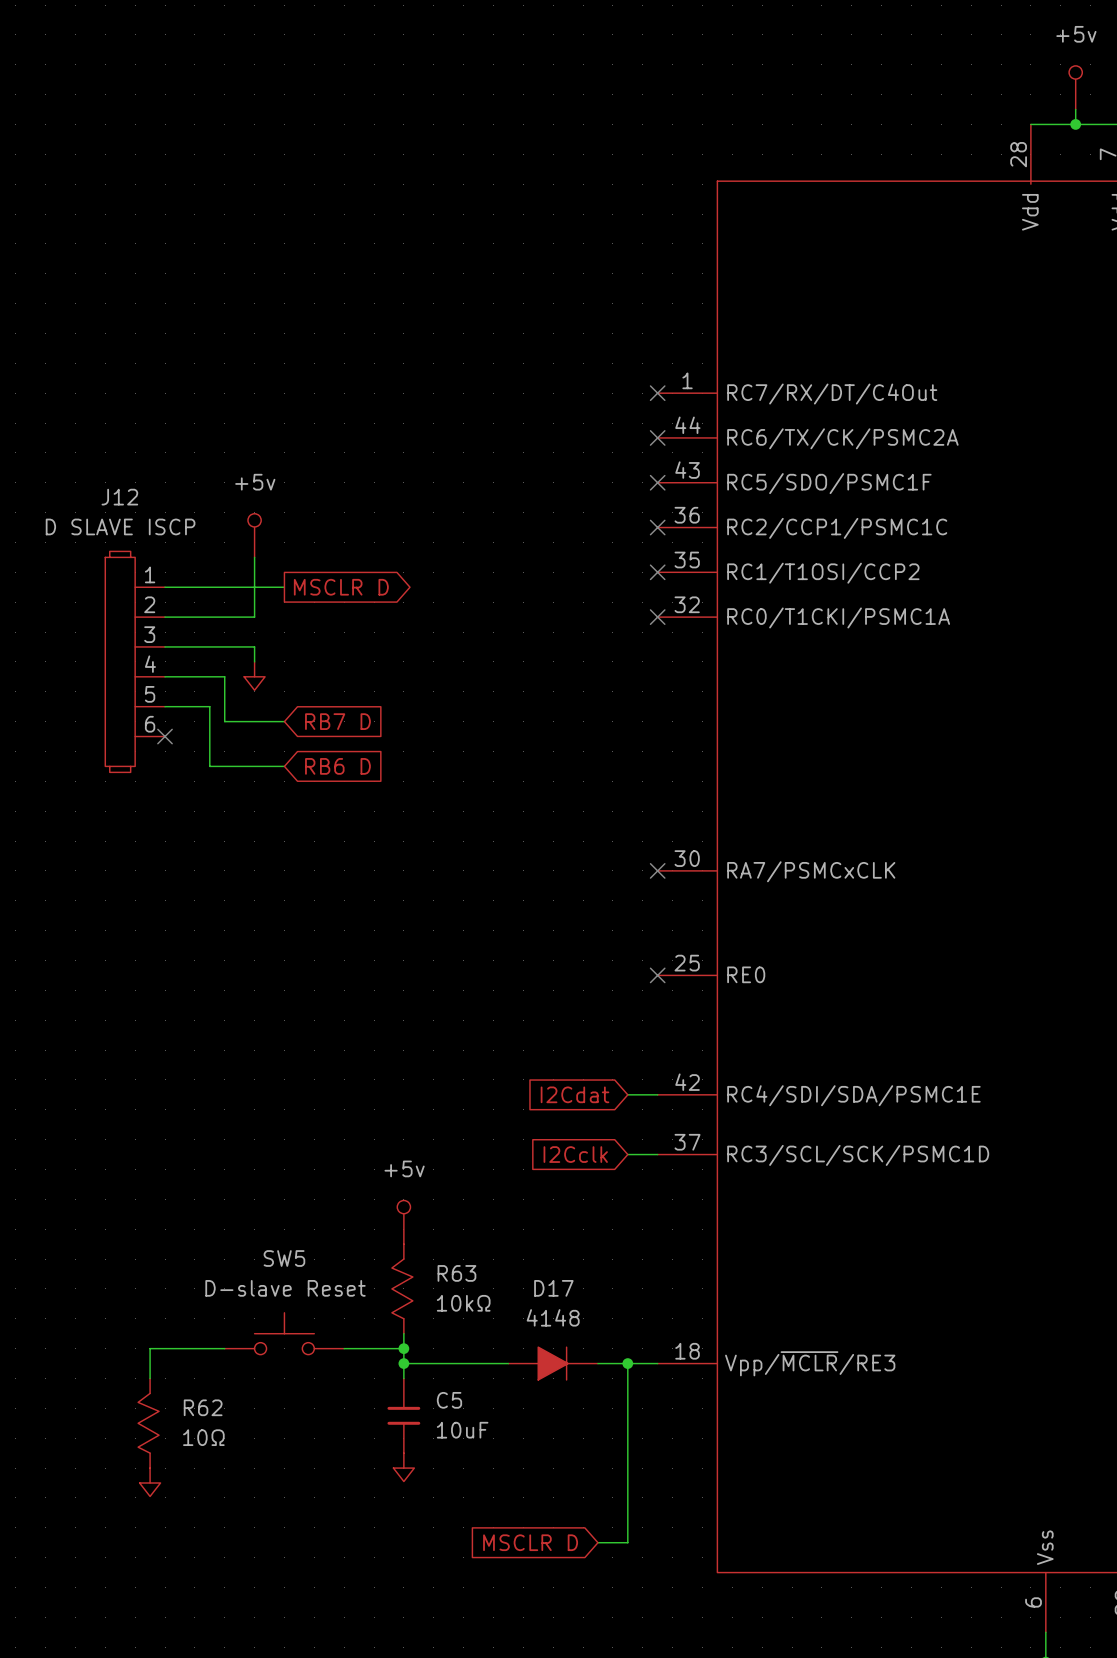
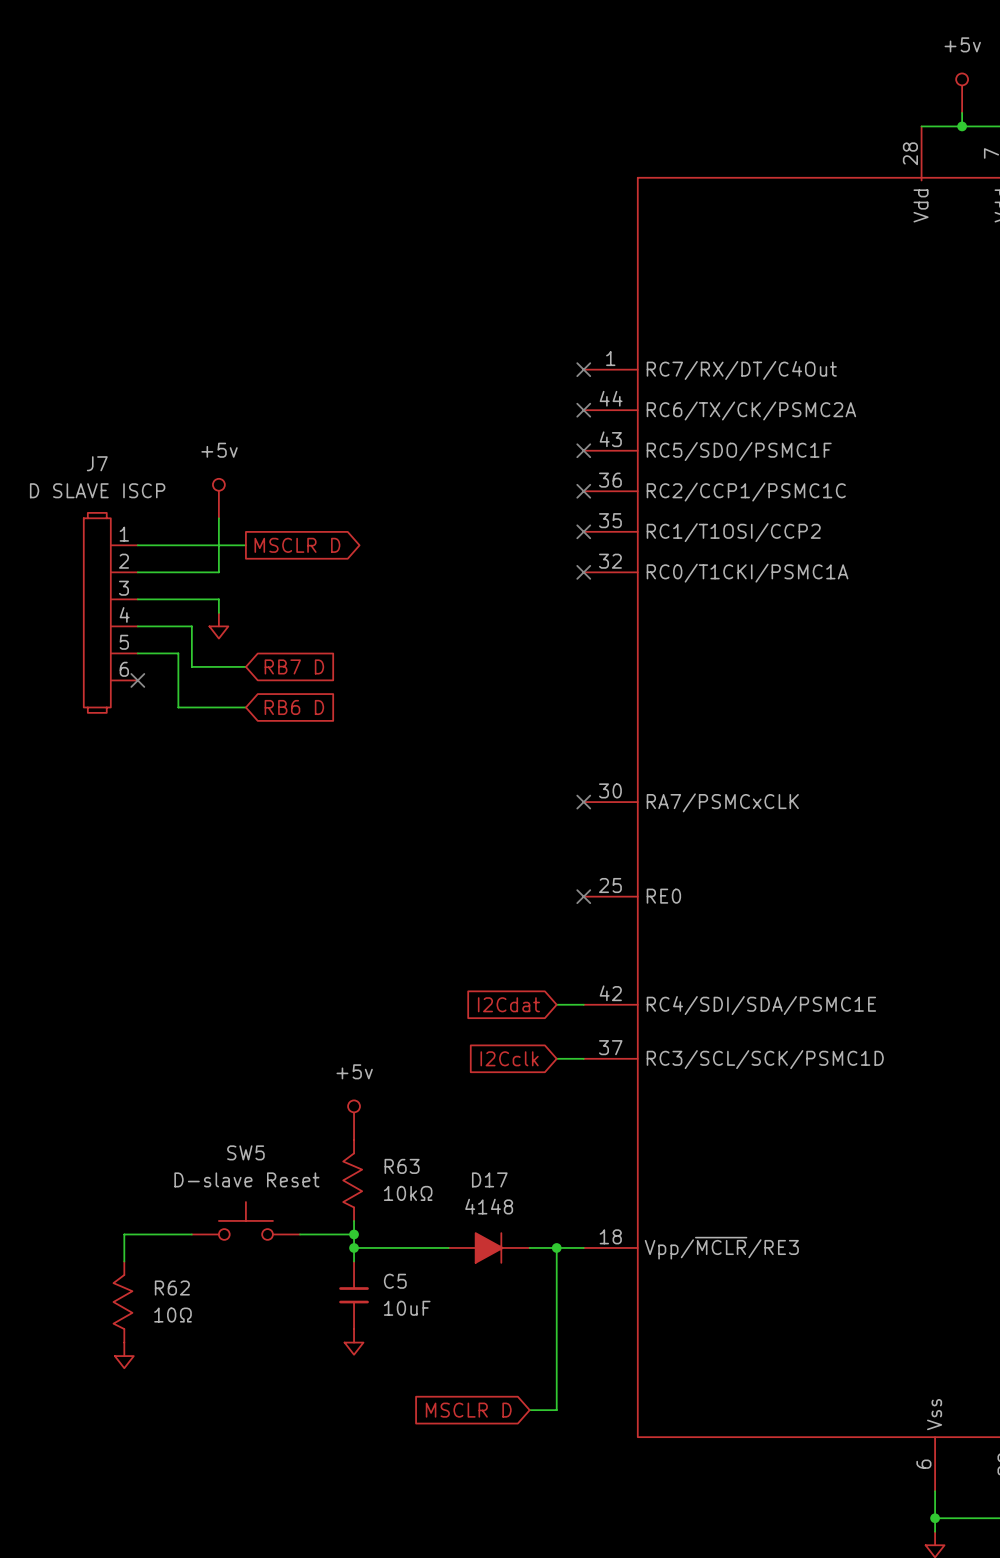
J12 name: J12 (119, 497) -> J7 (97, 463)

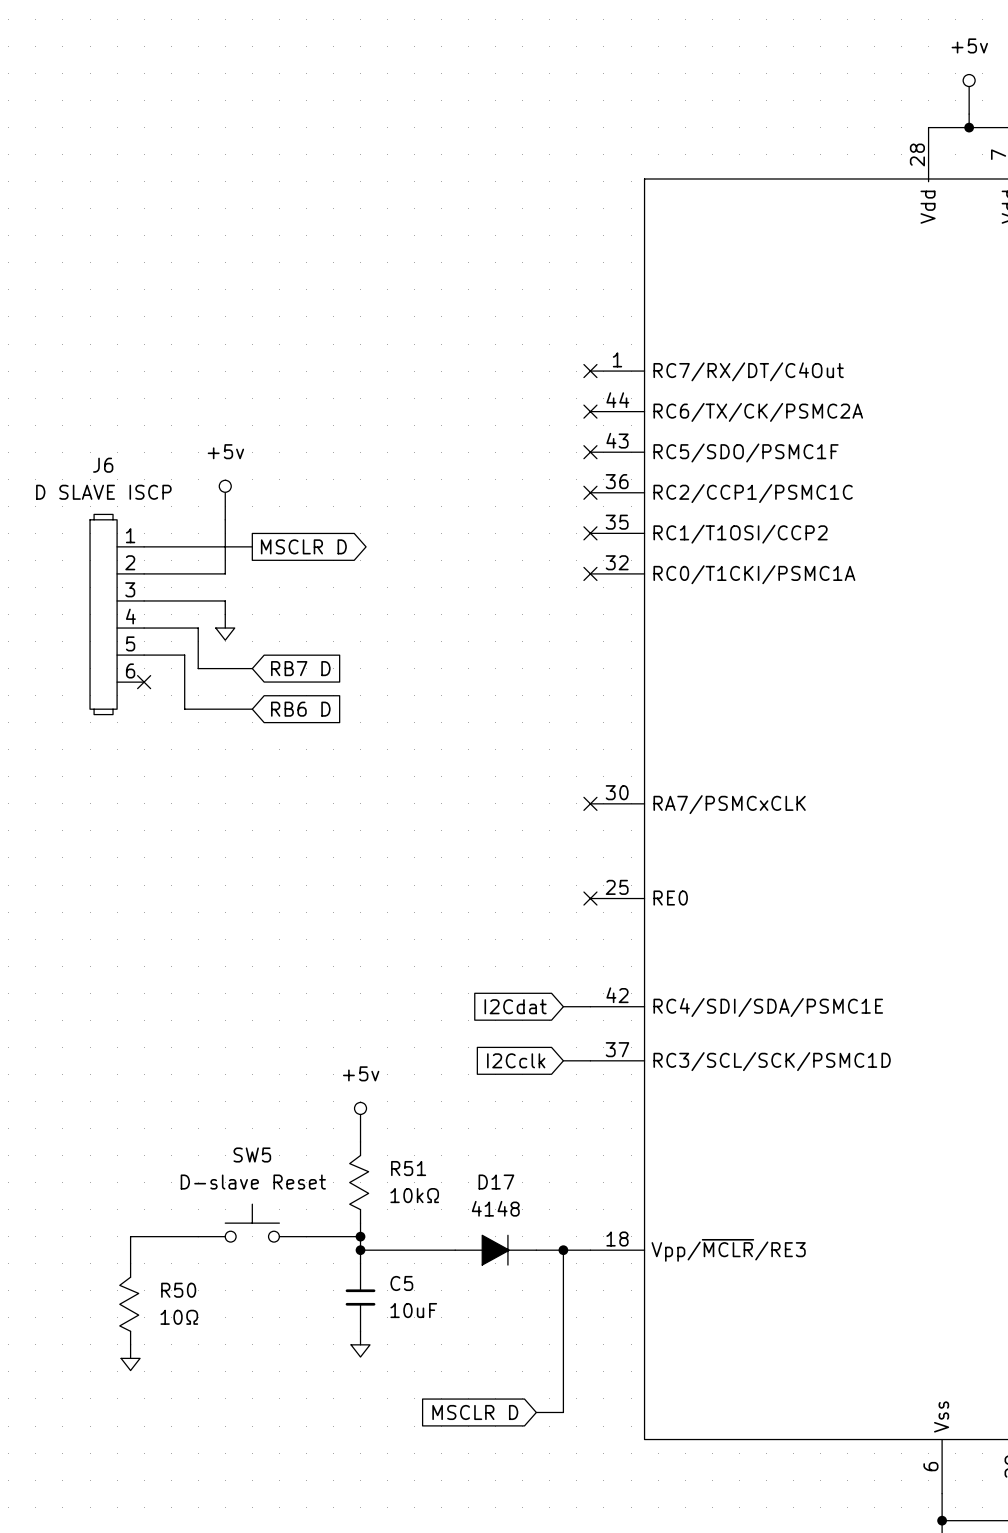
J7 name: J7 (97, 463) -> J6 (103, 465)
R63 name: R63 (402, 1166) -> R51 (408, 1168)
R62 name: R62 (172, 1288) -> R50 (178, 1290)

